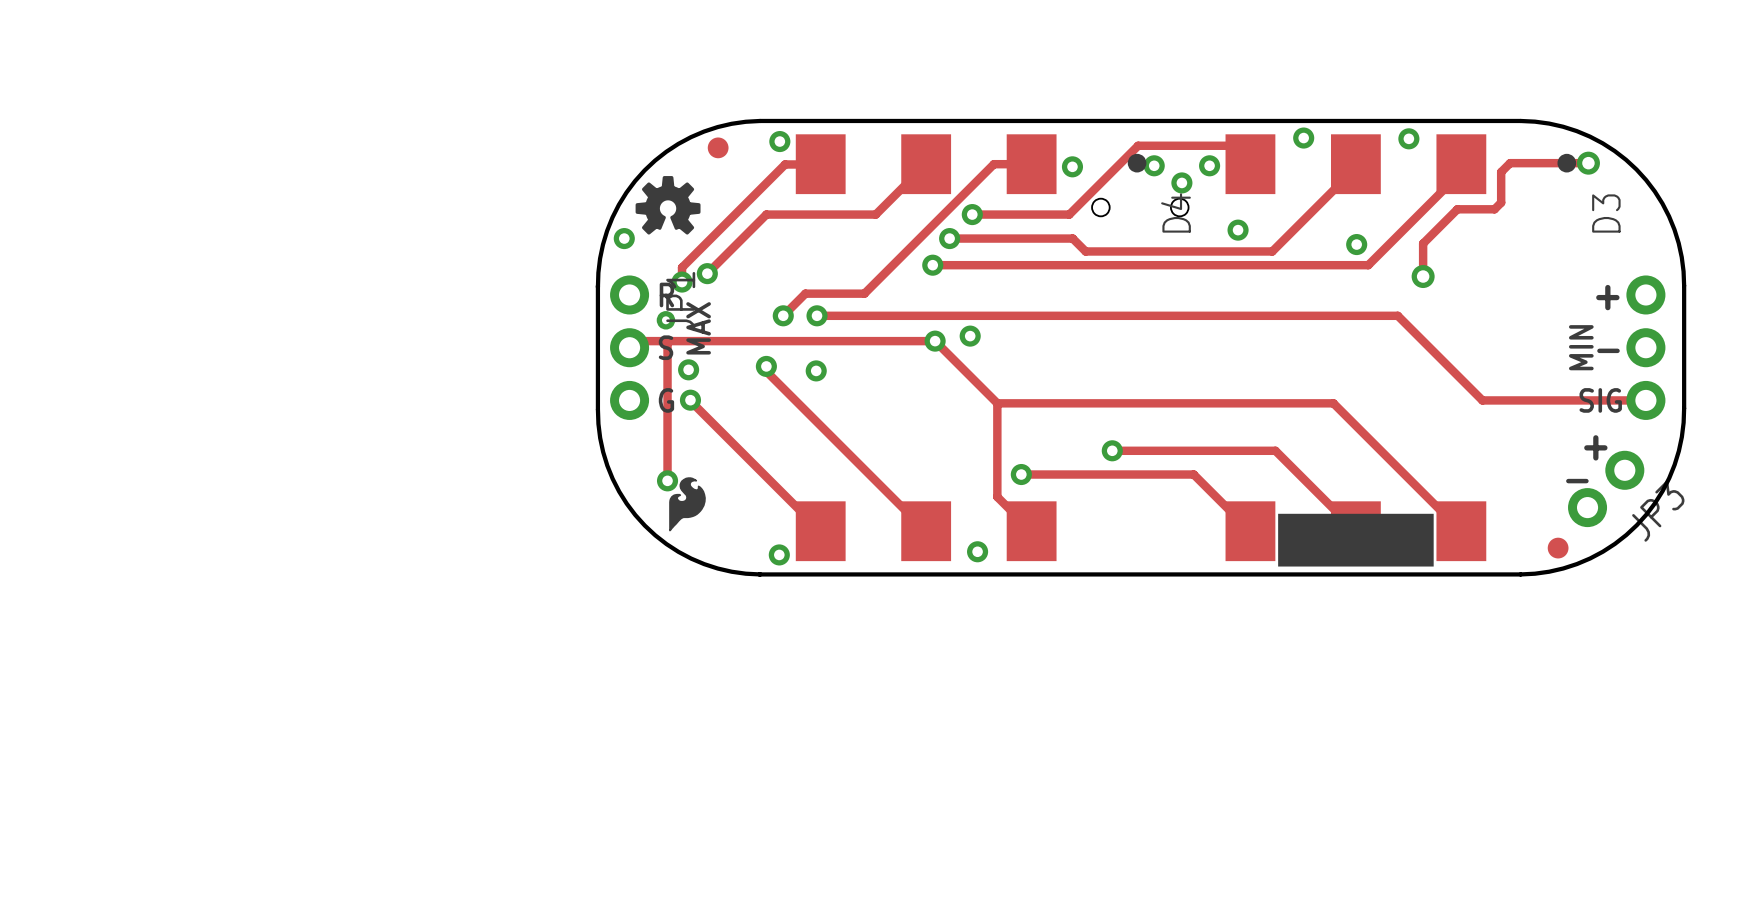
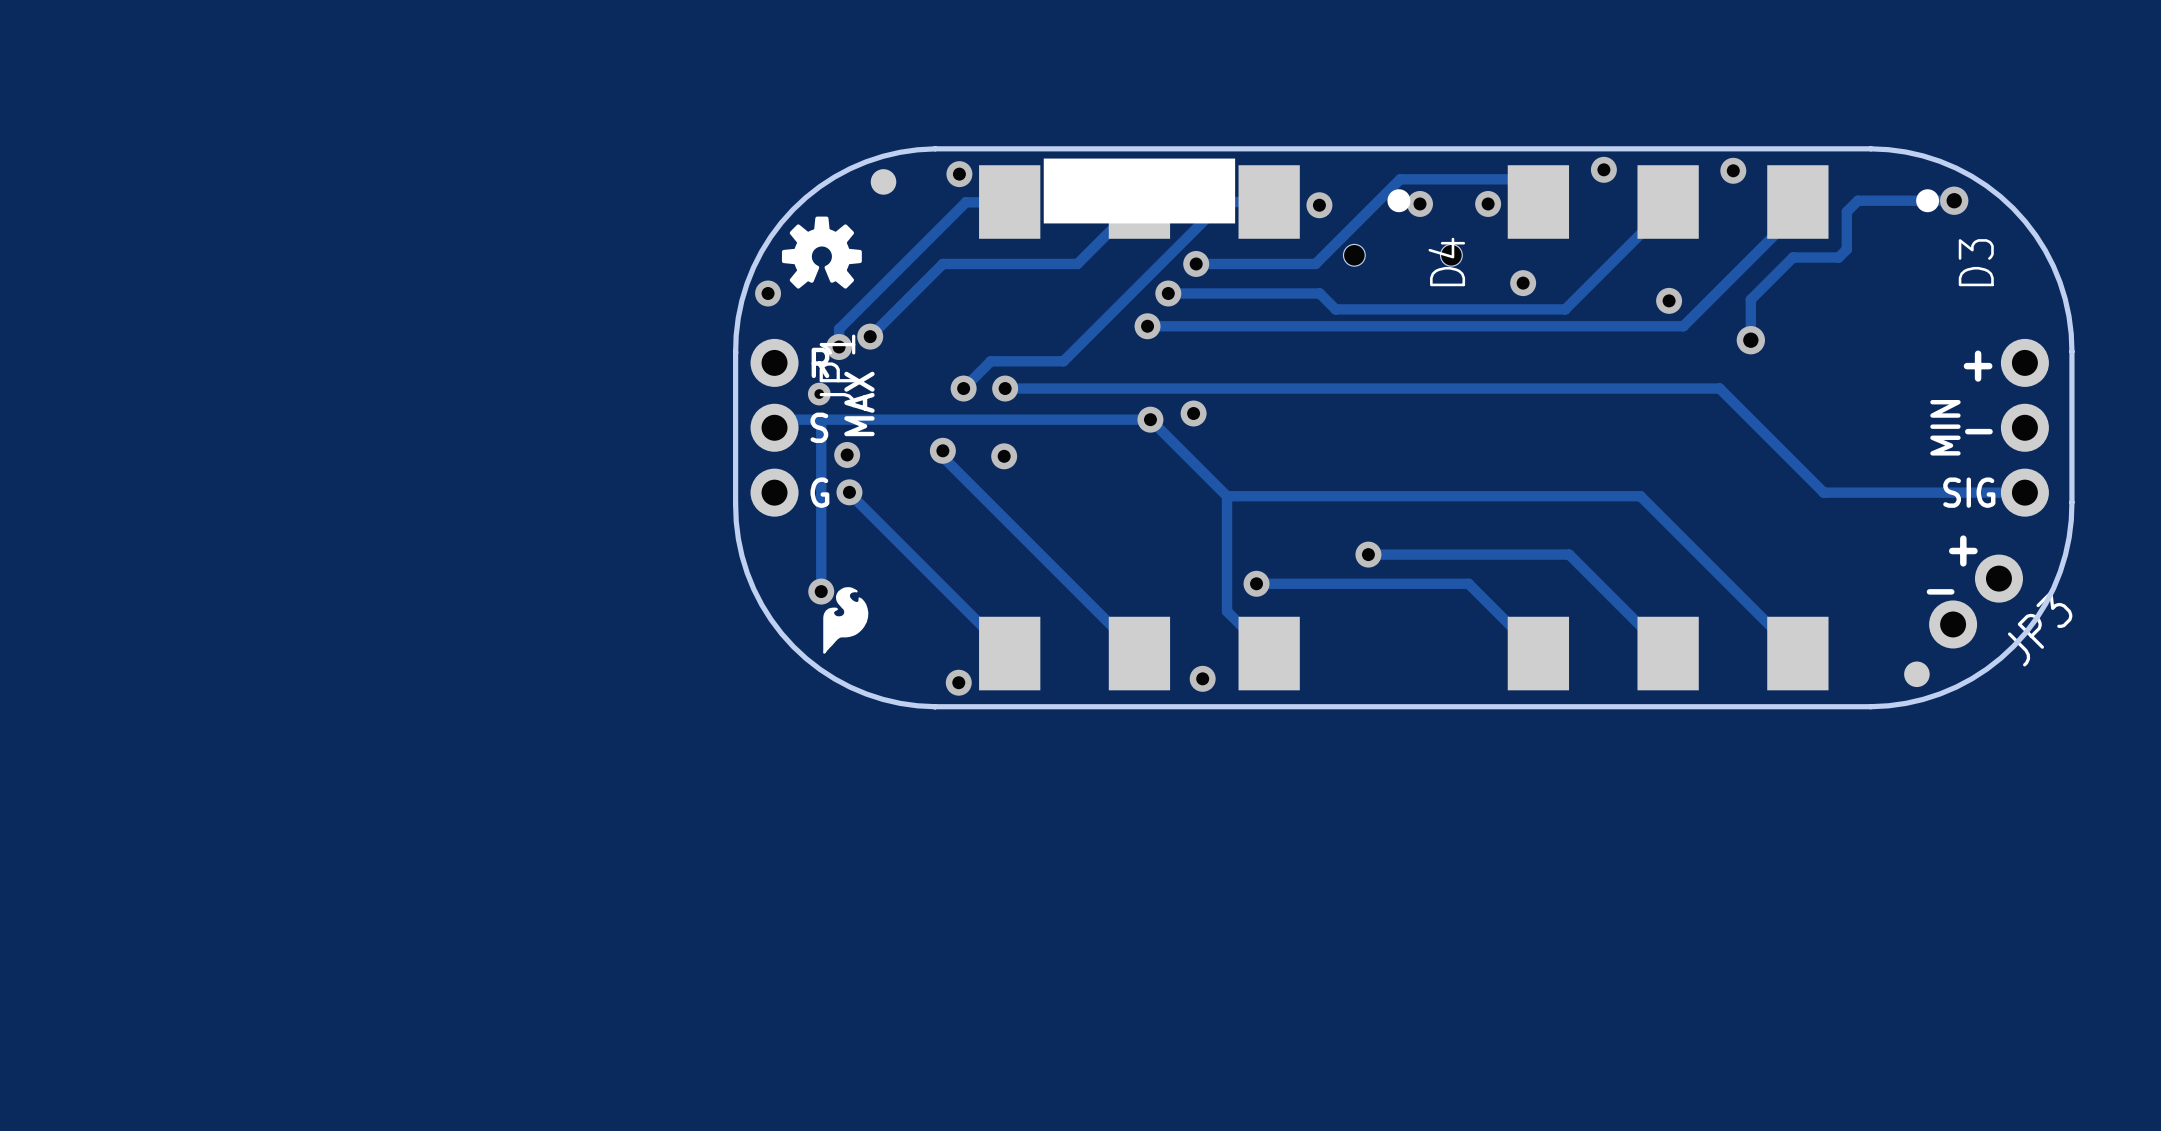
drawing: none -> [1043, 158, 1236, 224]
via: (1181, 182) -> none
drawing: [1278, 513, 1434, 567] -> none

